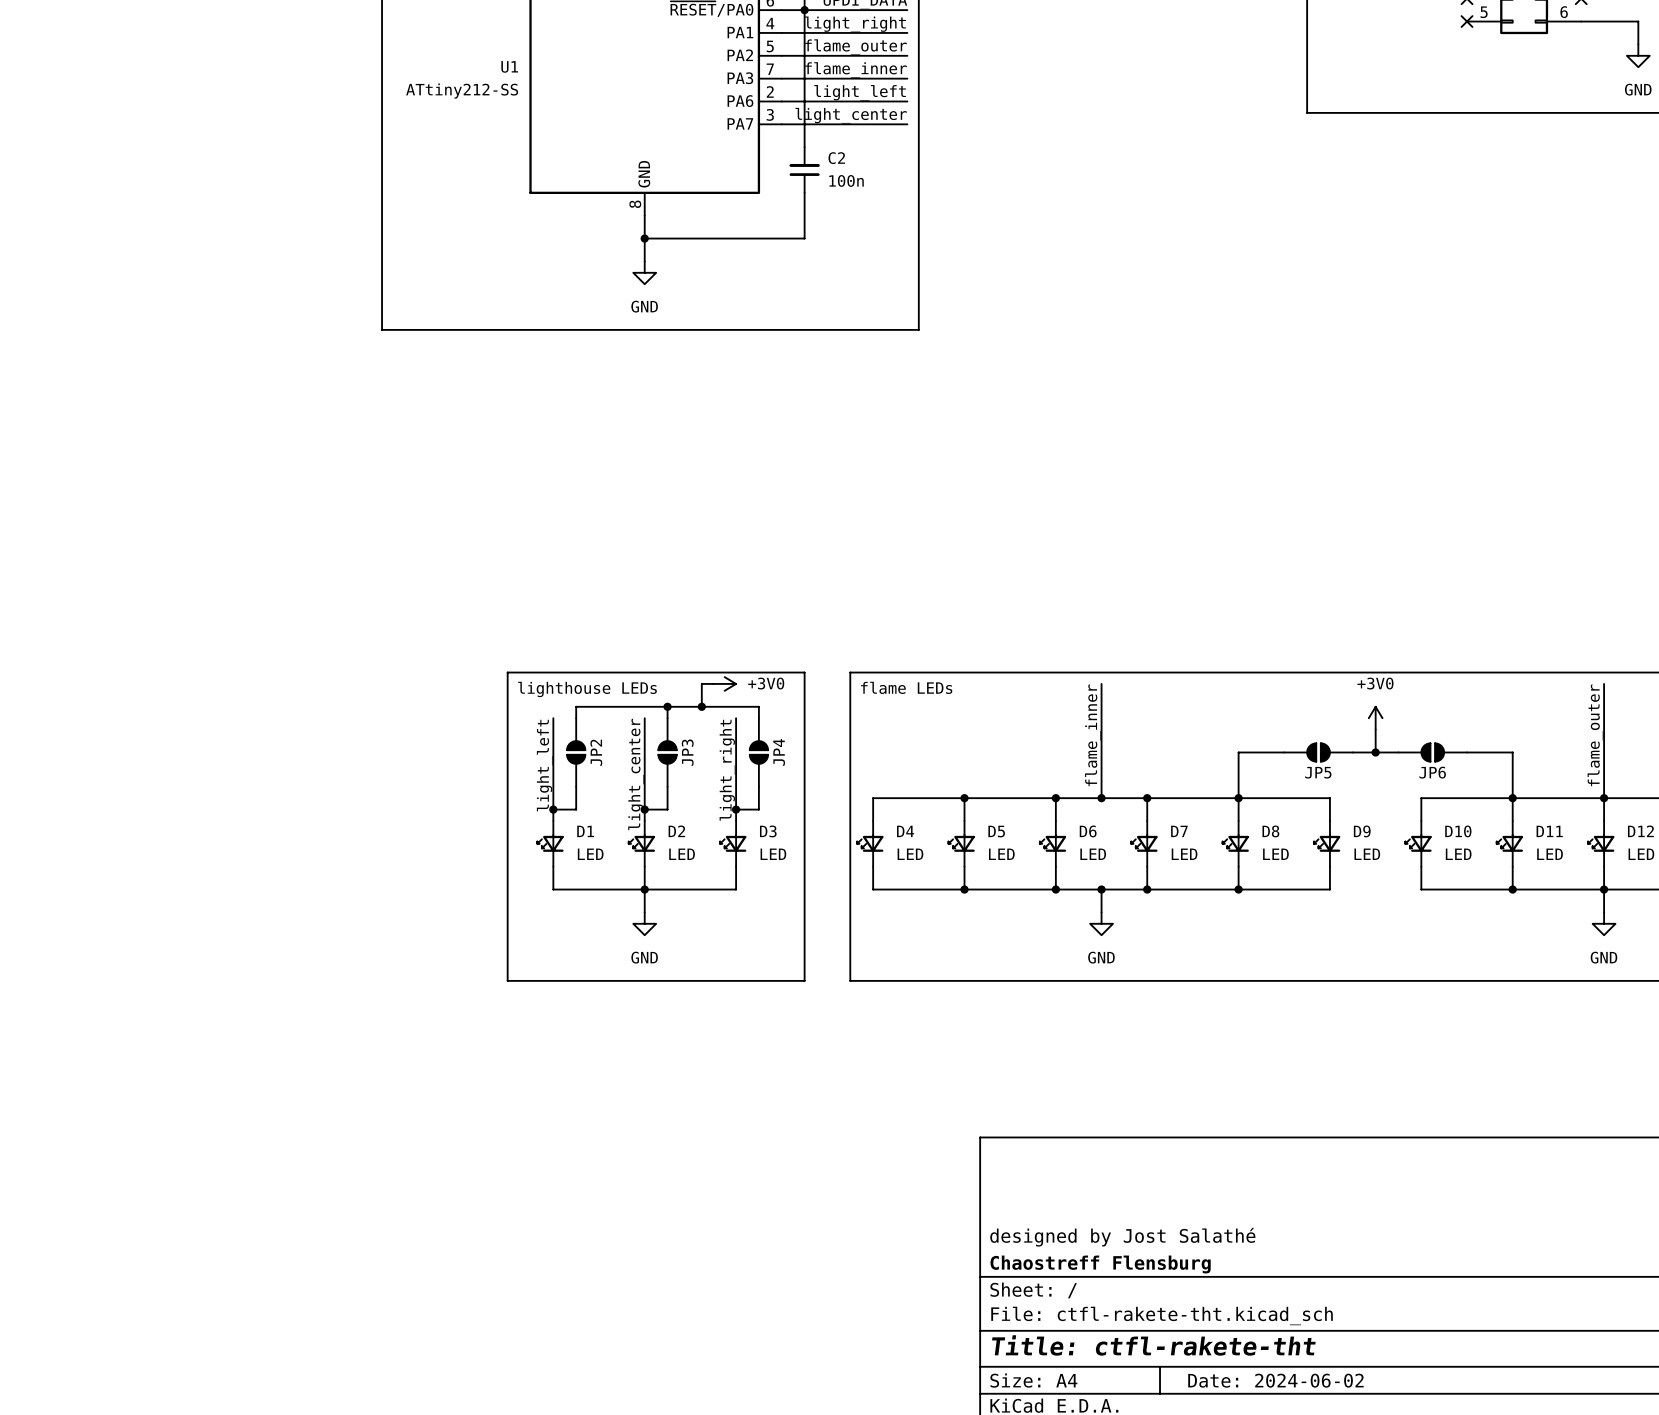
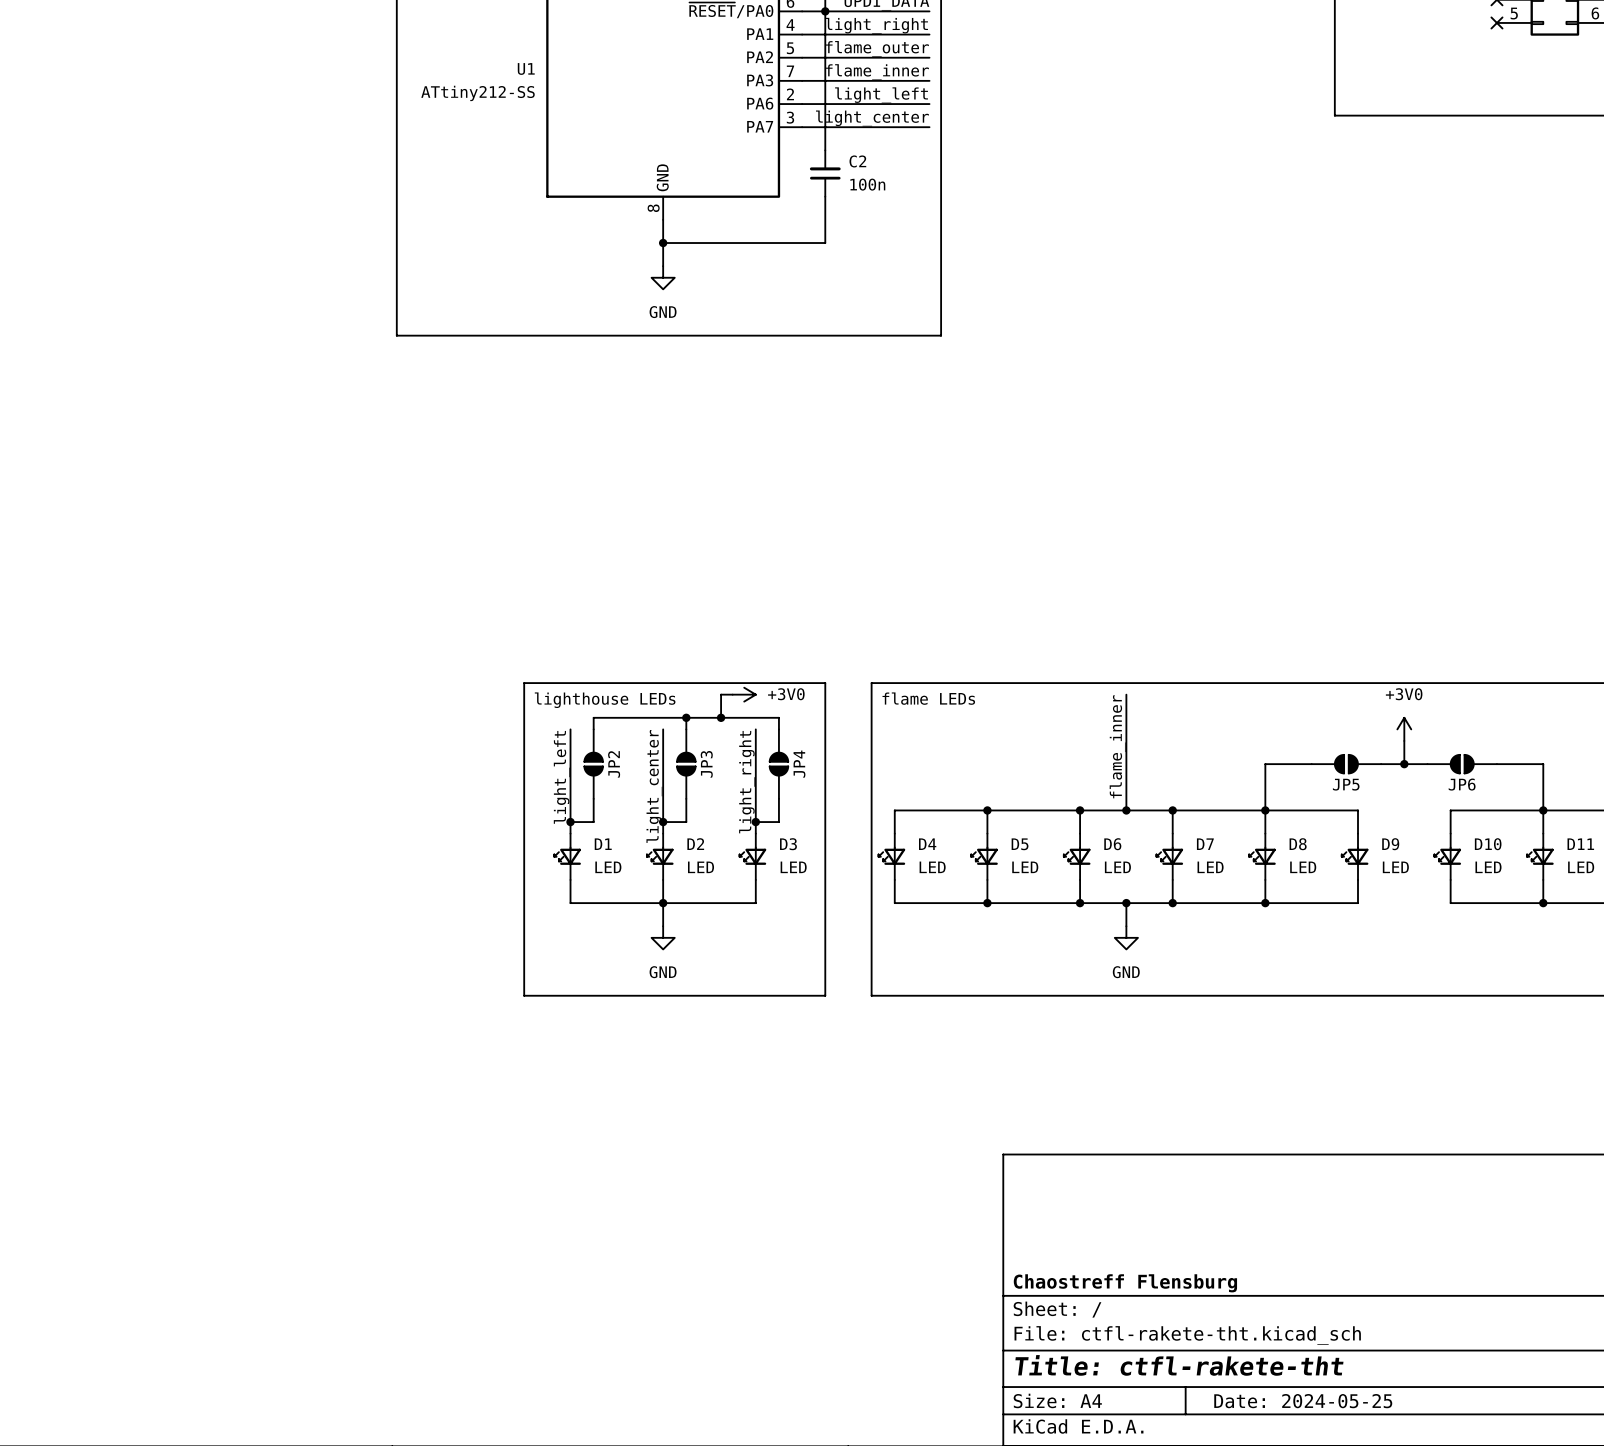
title block: designed by Jost Salathé (1122, 1237) -> none
title block: Date: 2024-06-02 (1275, 1380) -> Date: 2024-05-25 (1303, 1401)

